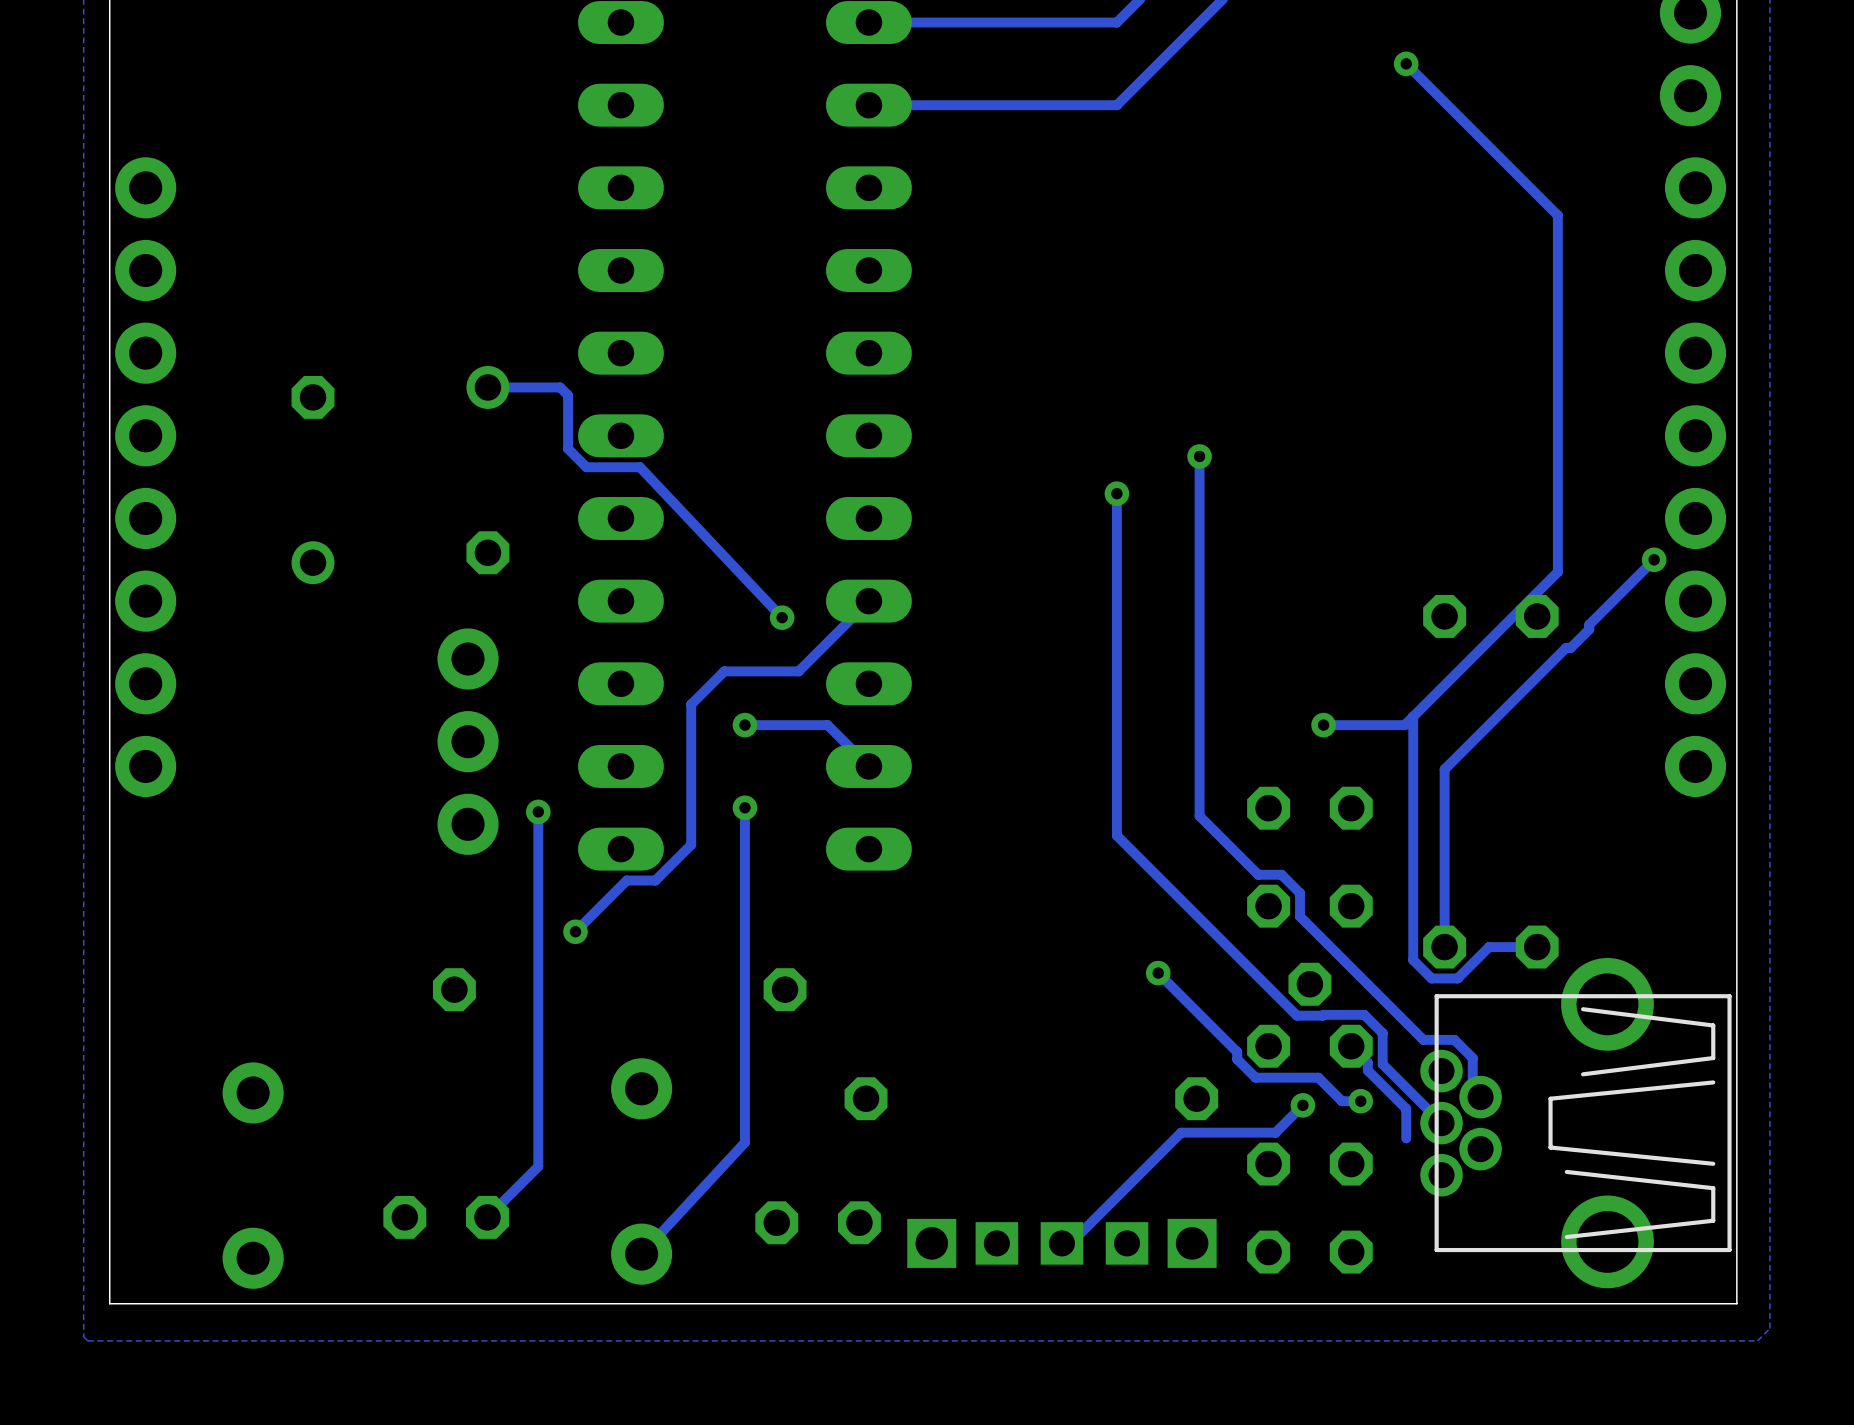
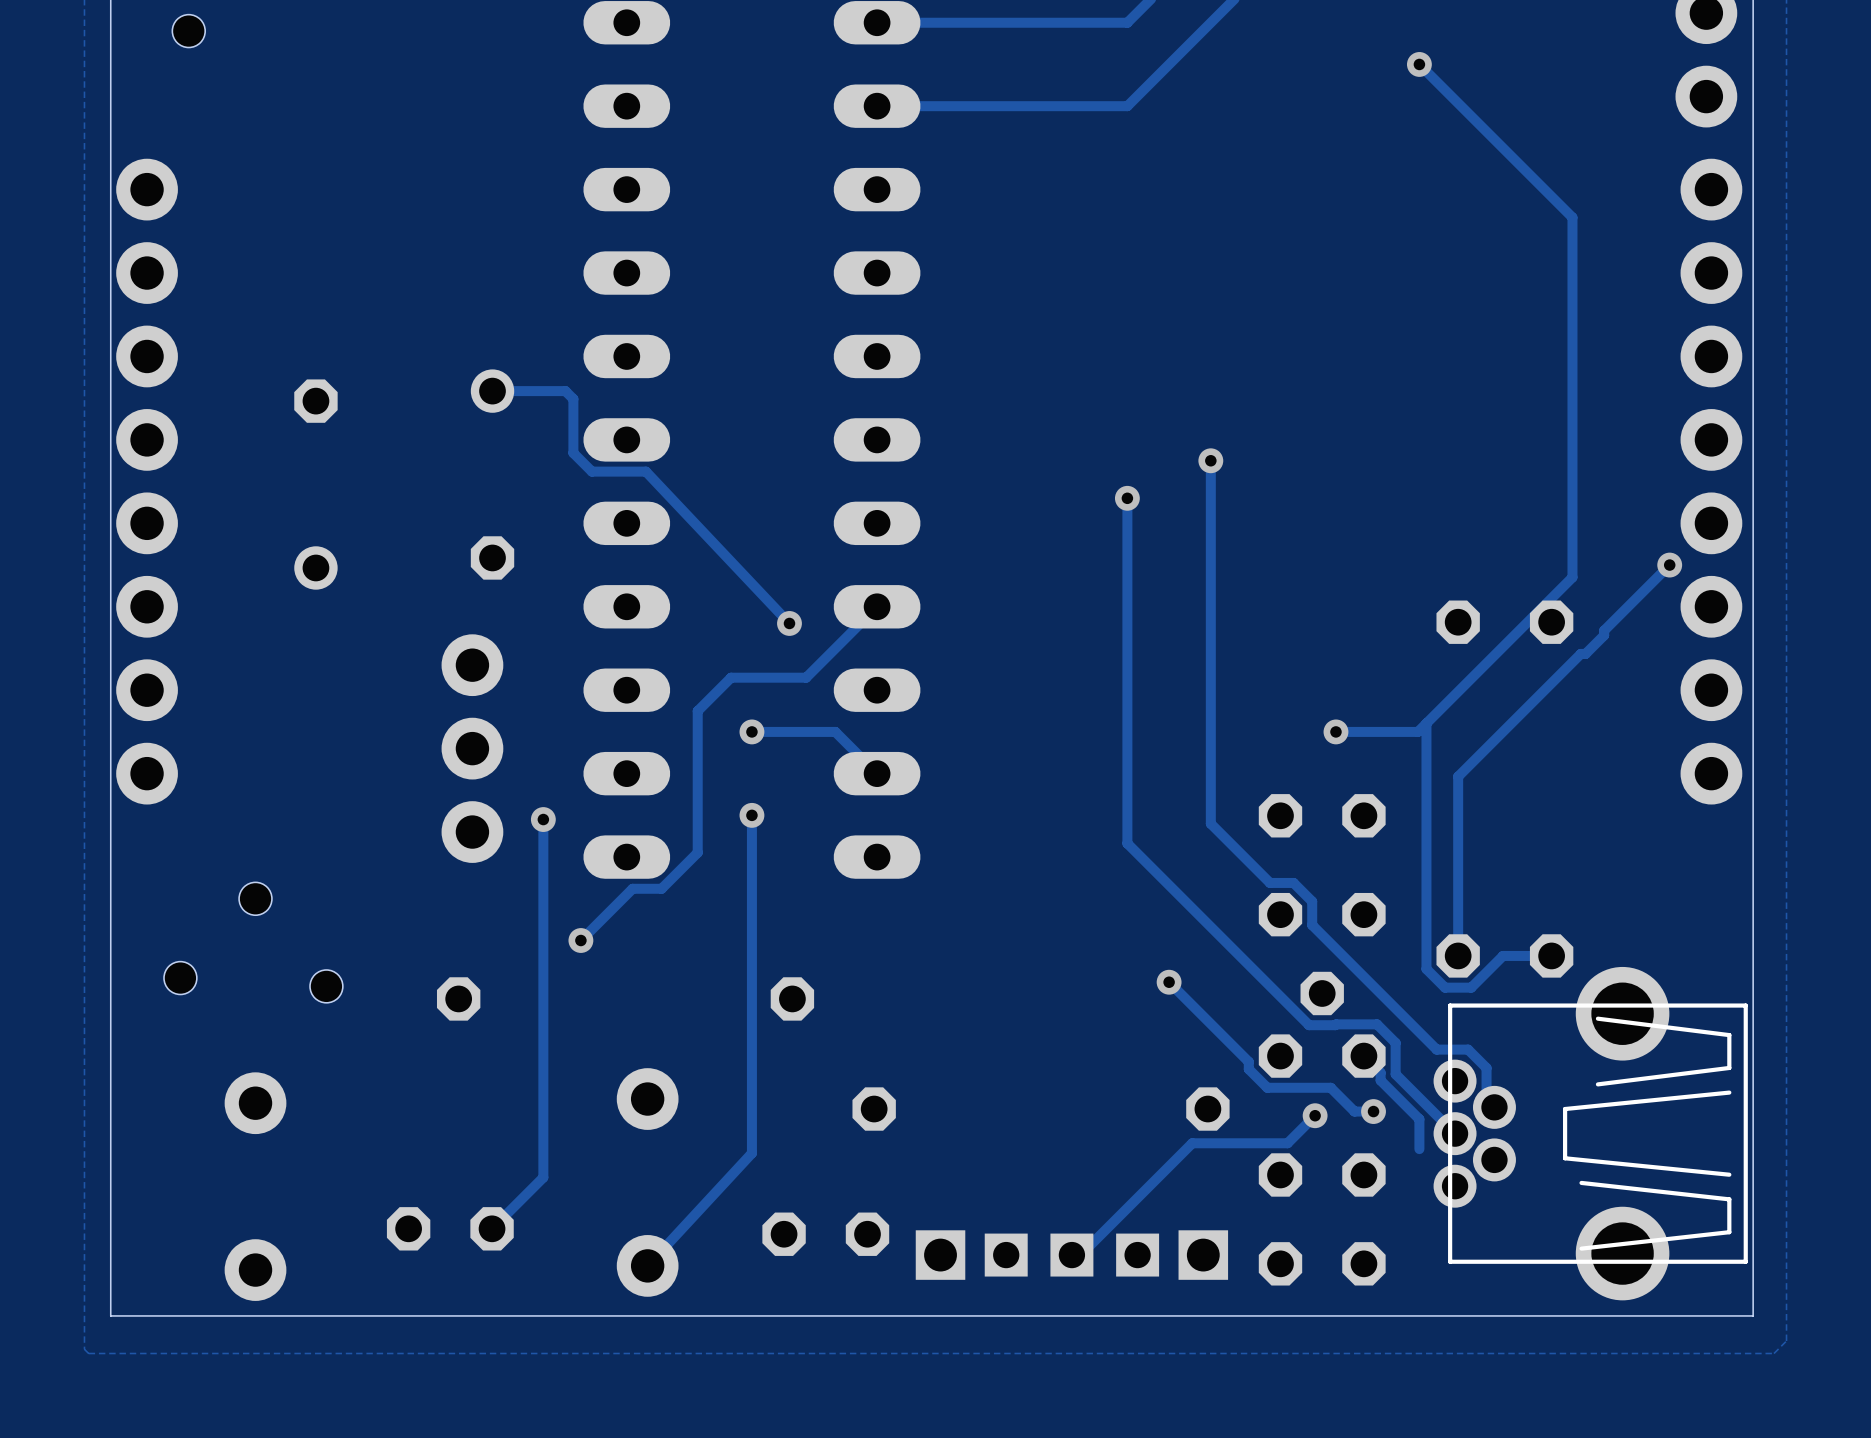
hole: none -> (188, 31)
hole: none -> (255, 898)
hole: none -> (180, 978)
hole: none -> (326, 986)

